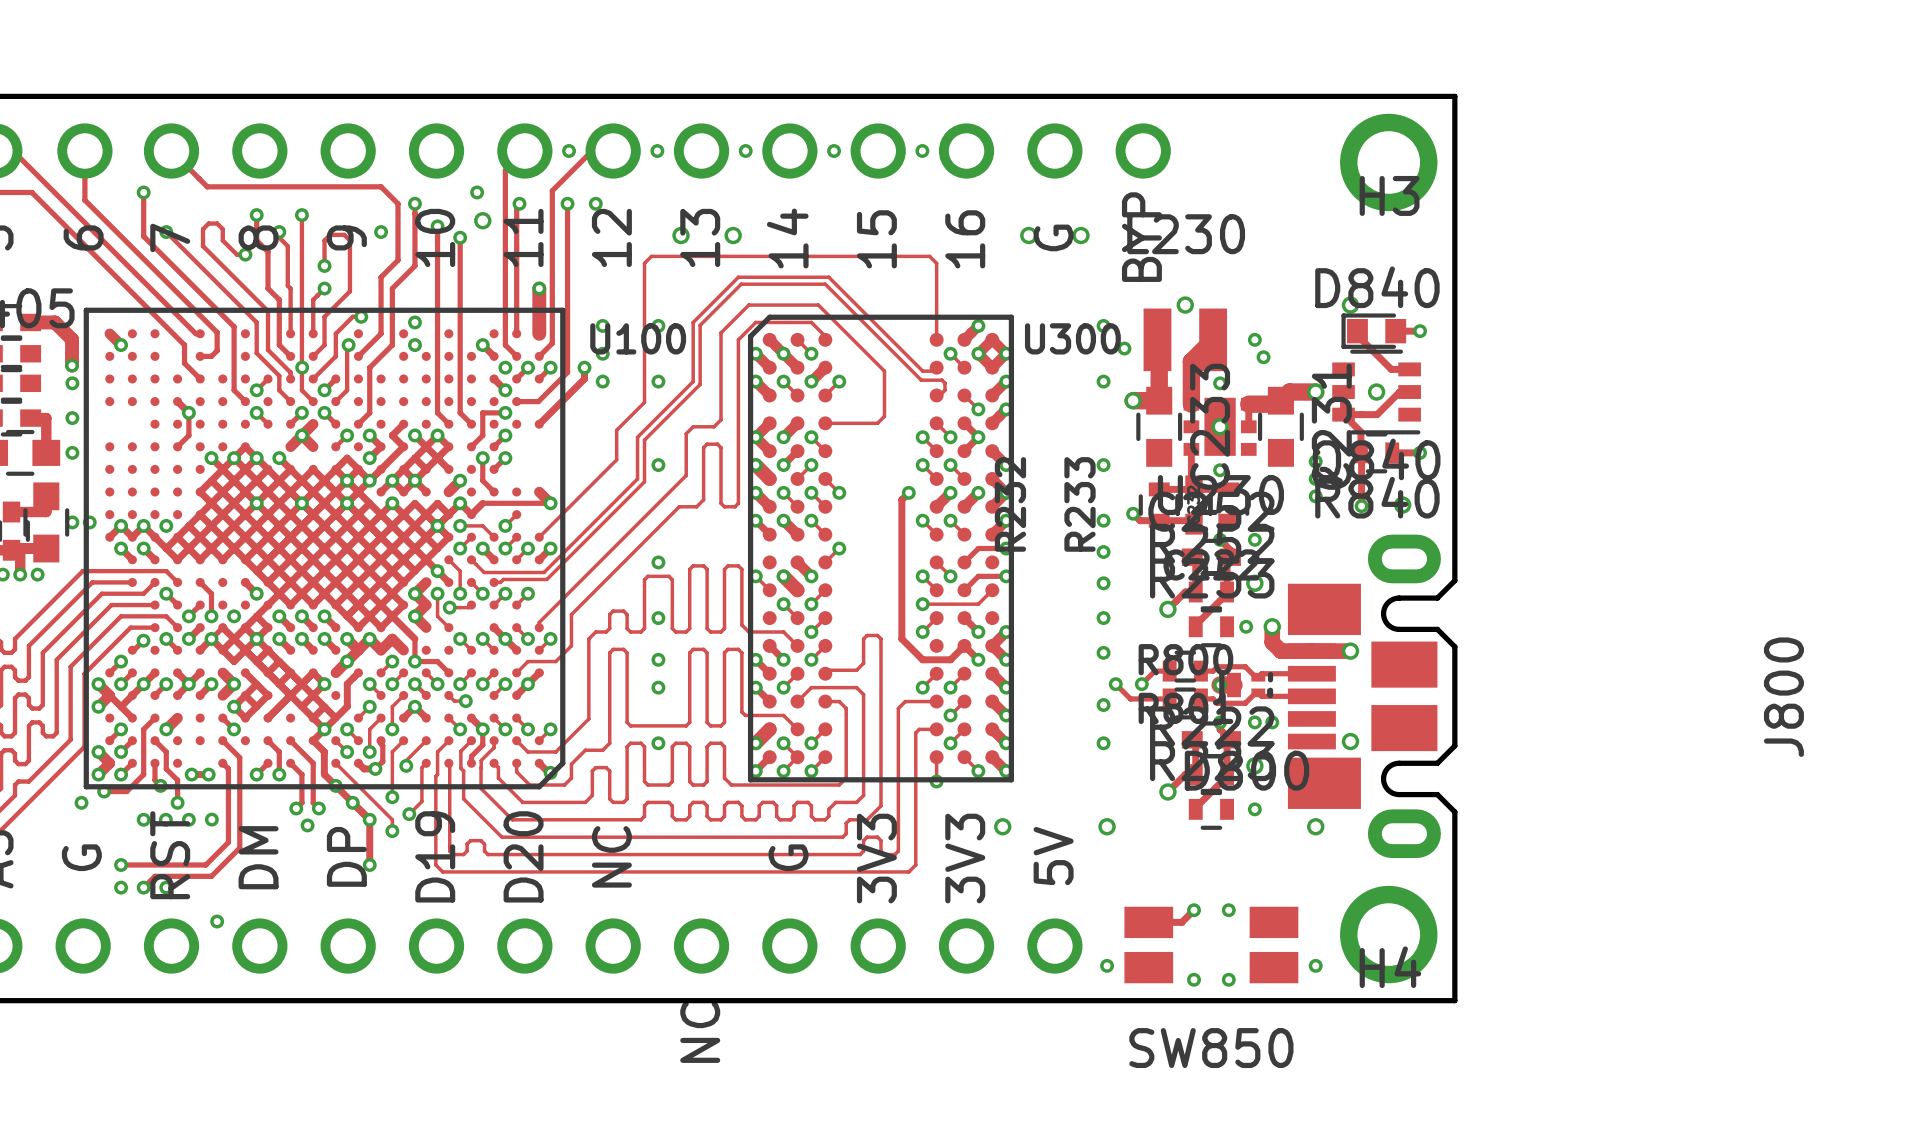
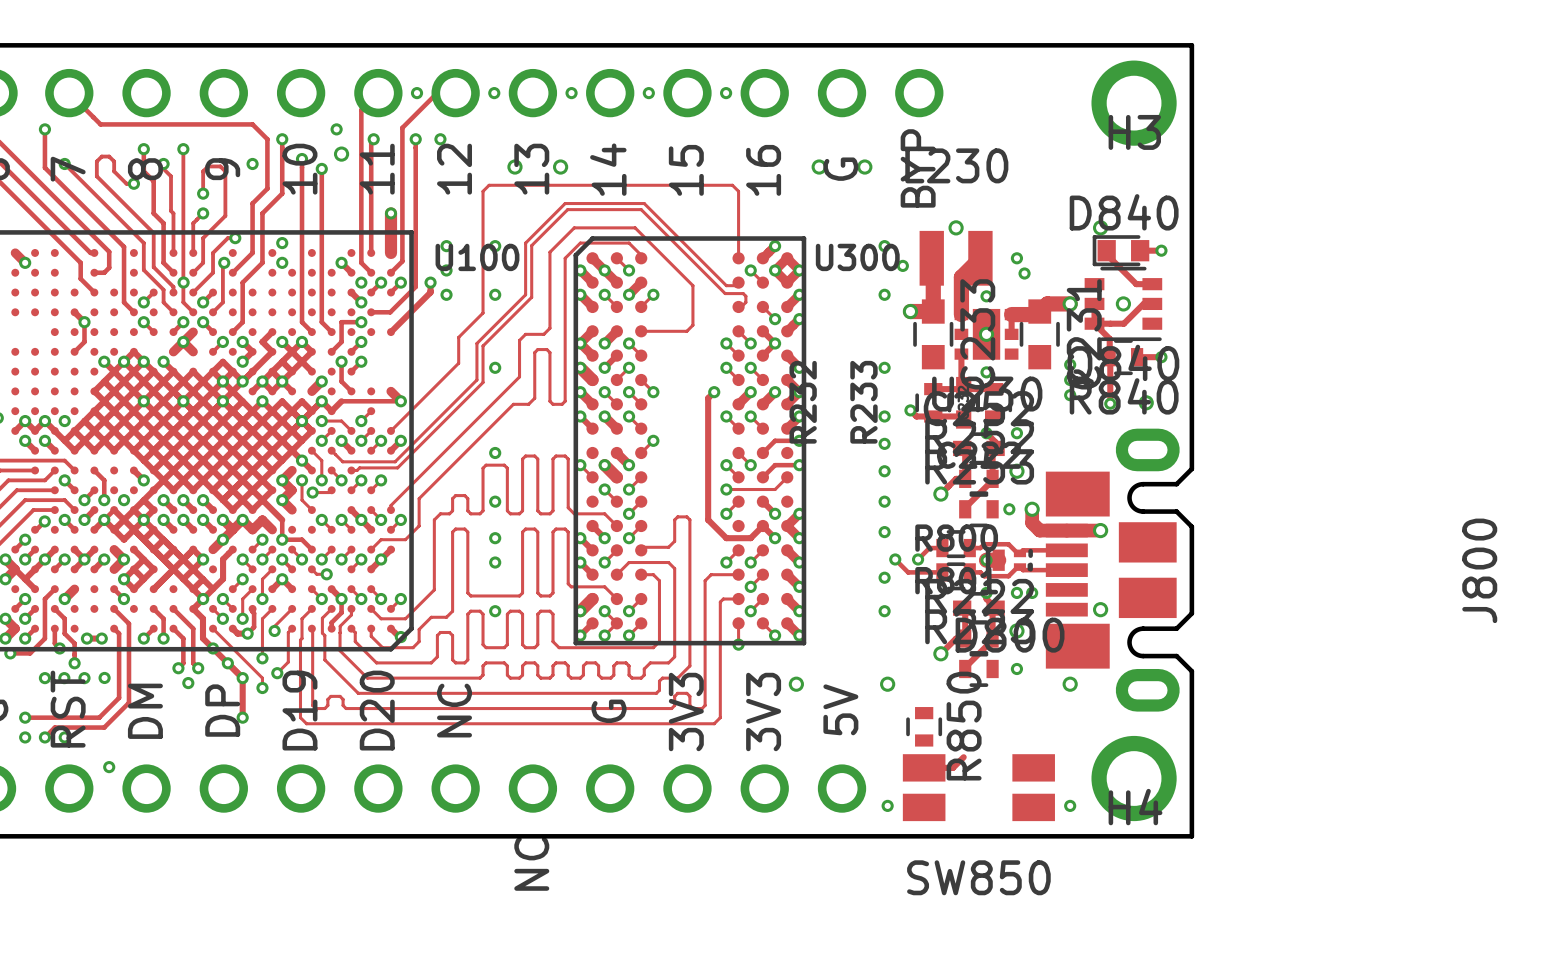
R850: none -> (924, 726)
via: (1194, 910) -> none
via: (1228, 910) -> none
via: (1194, 979) -> none
via: (1228, 979) -> none

